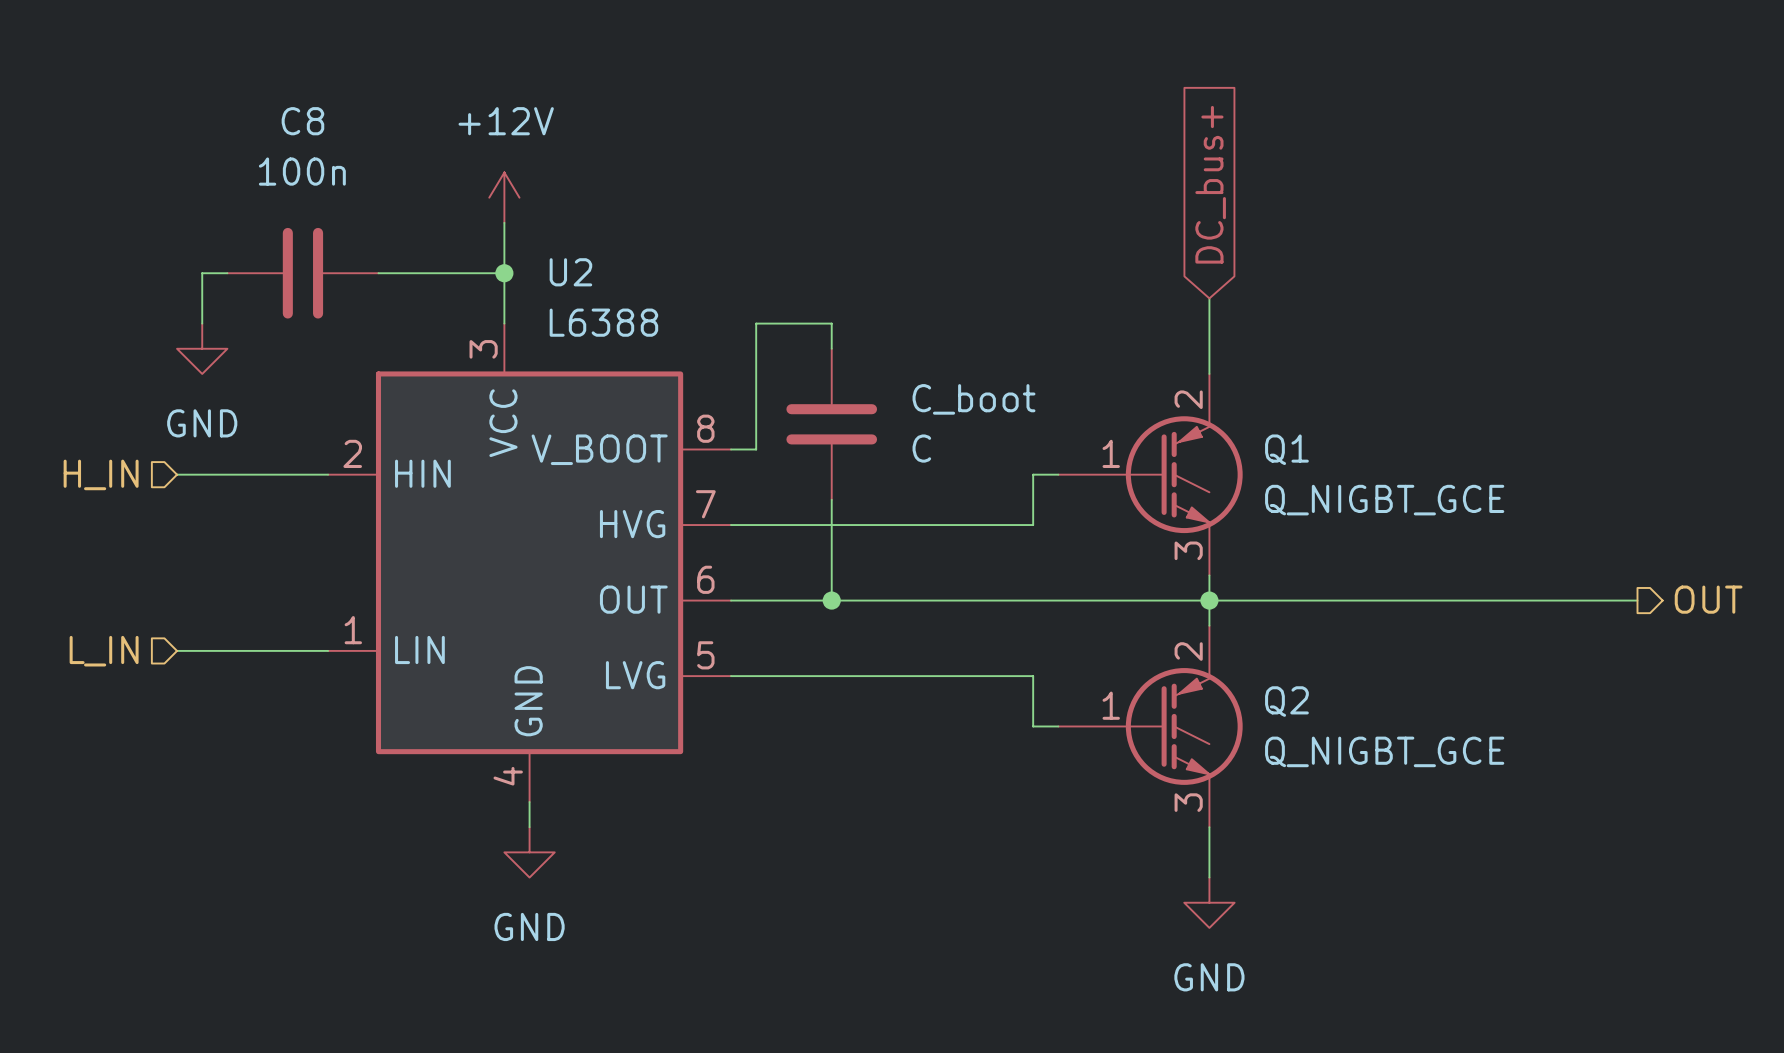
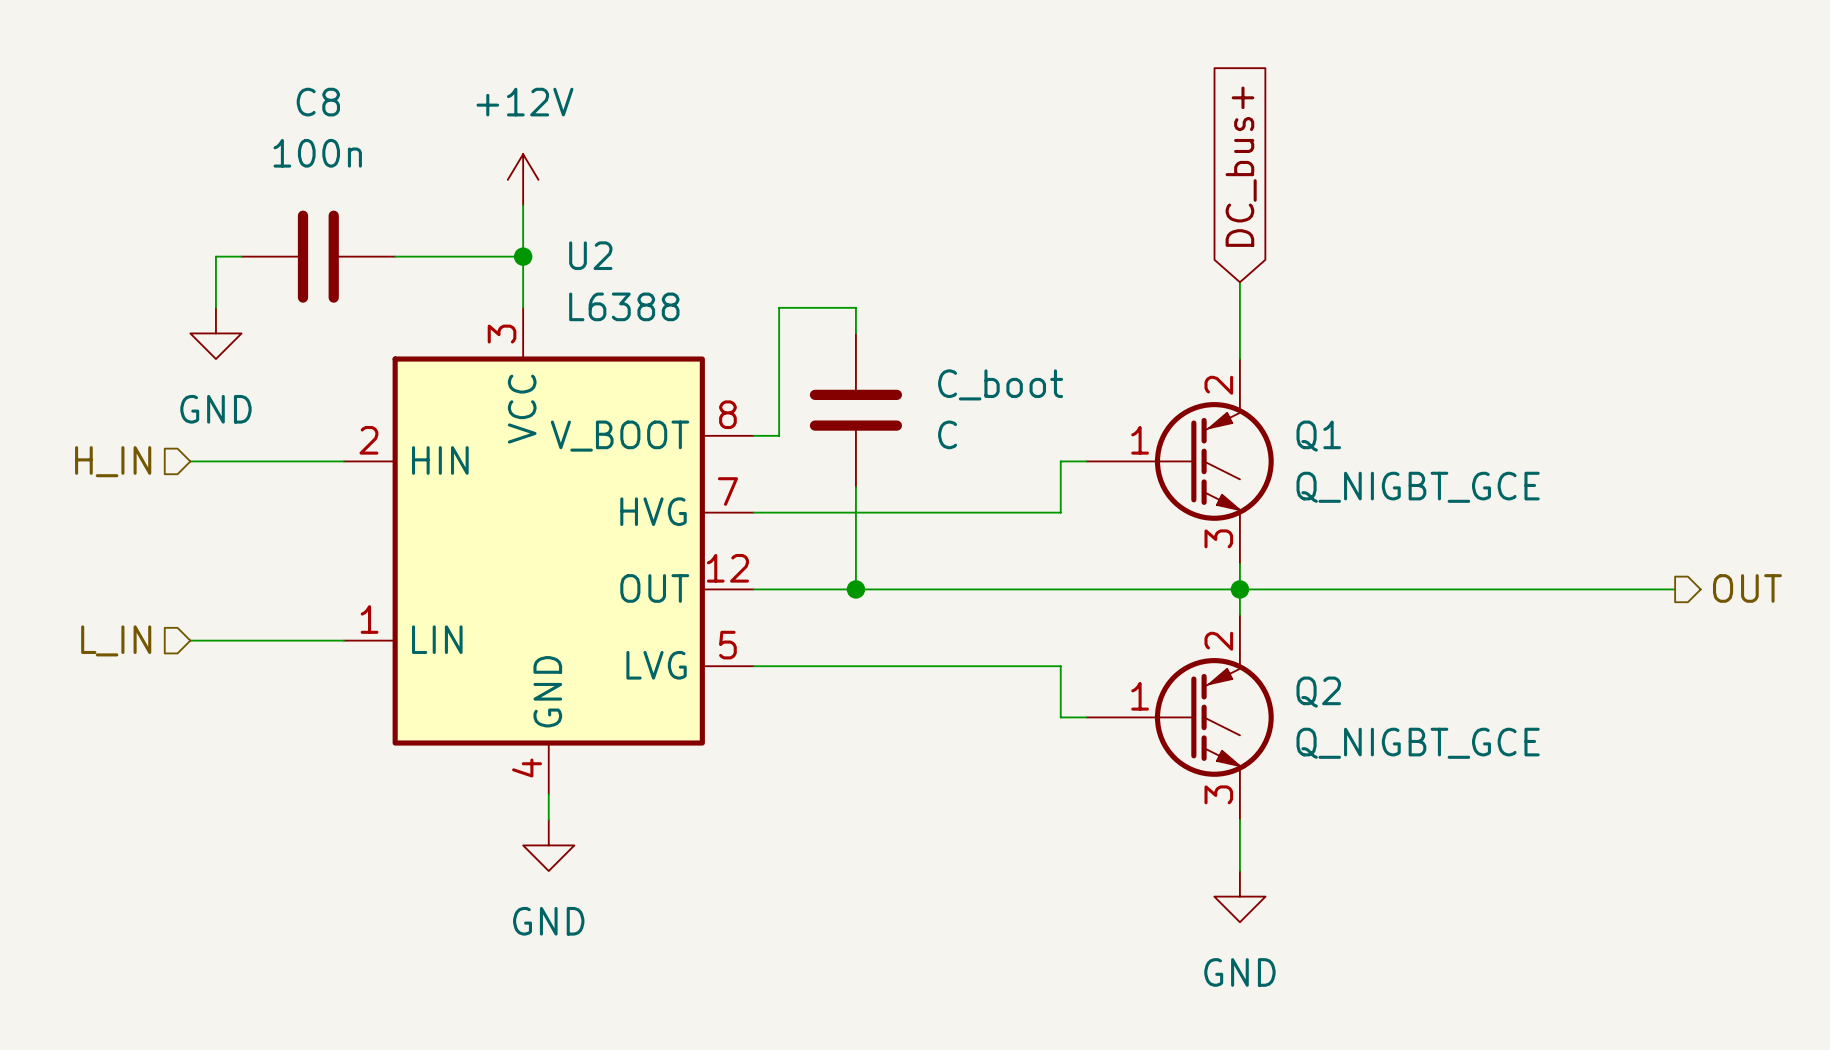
U2 pin number: 6 (705, 579) -> 12 (727, 568)

